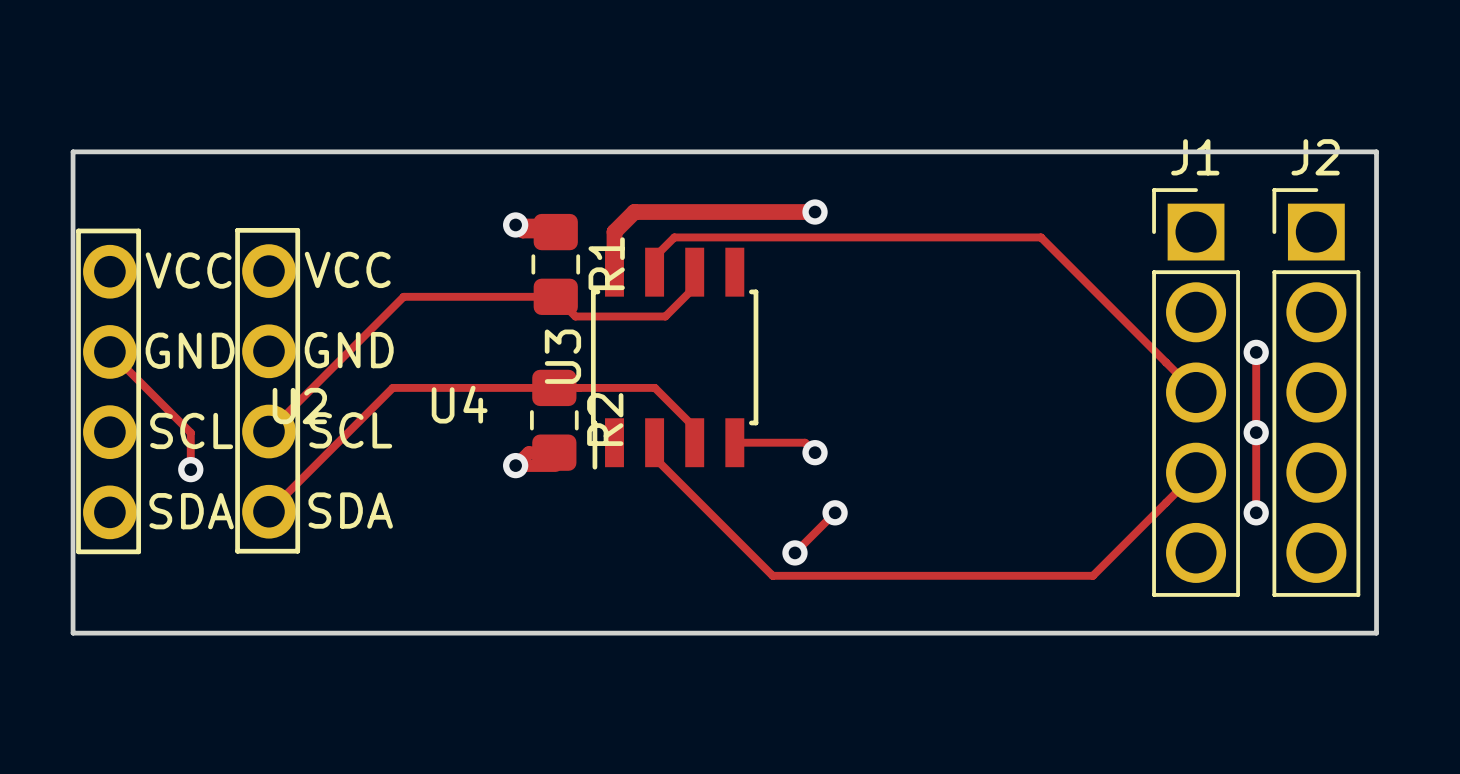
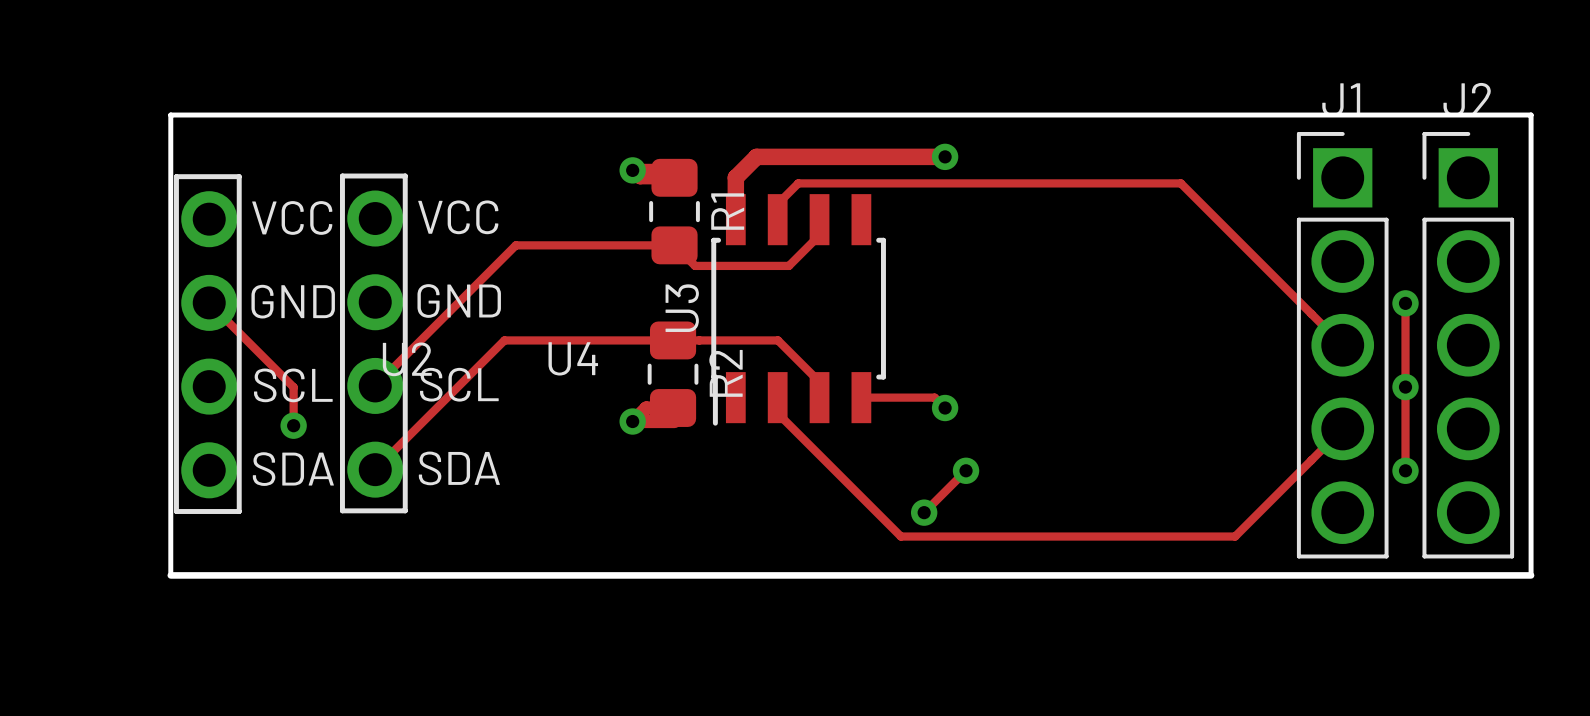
board edge: (73, 171) (73, 151) (1376, 151) (1376, 171) -> (170, 115) (1531, 115)
board edge: (73, 613) (73, 633) (1376, 633) (1376, 613) -> (170, 575) (1531, 575)

